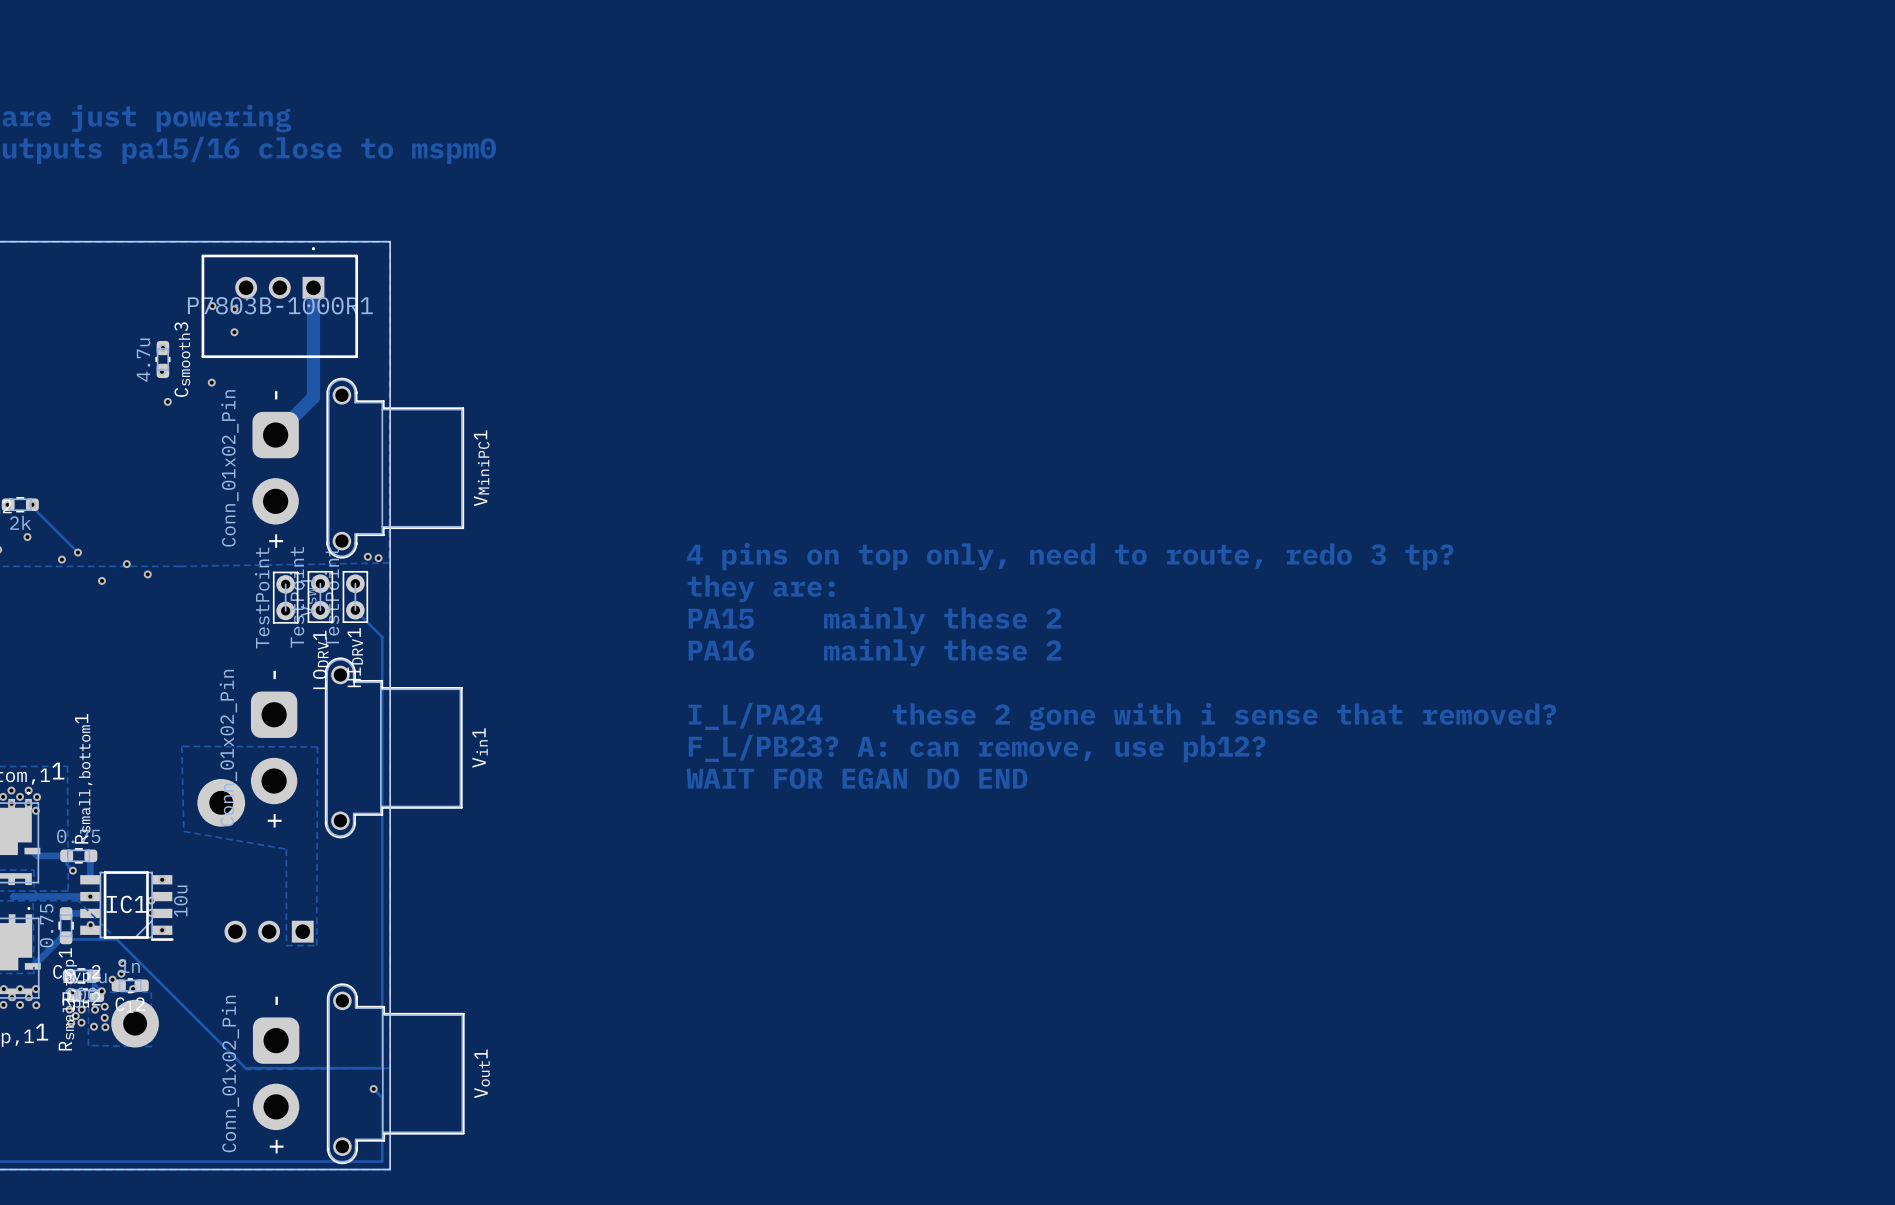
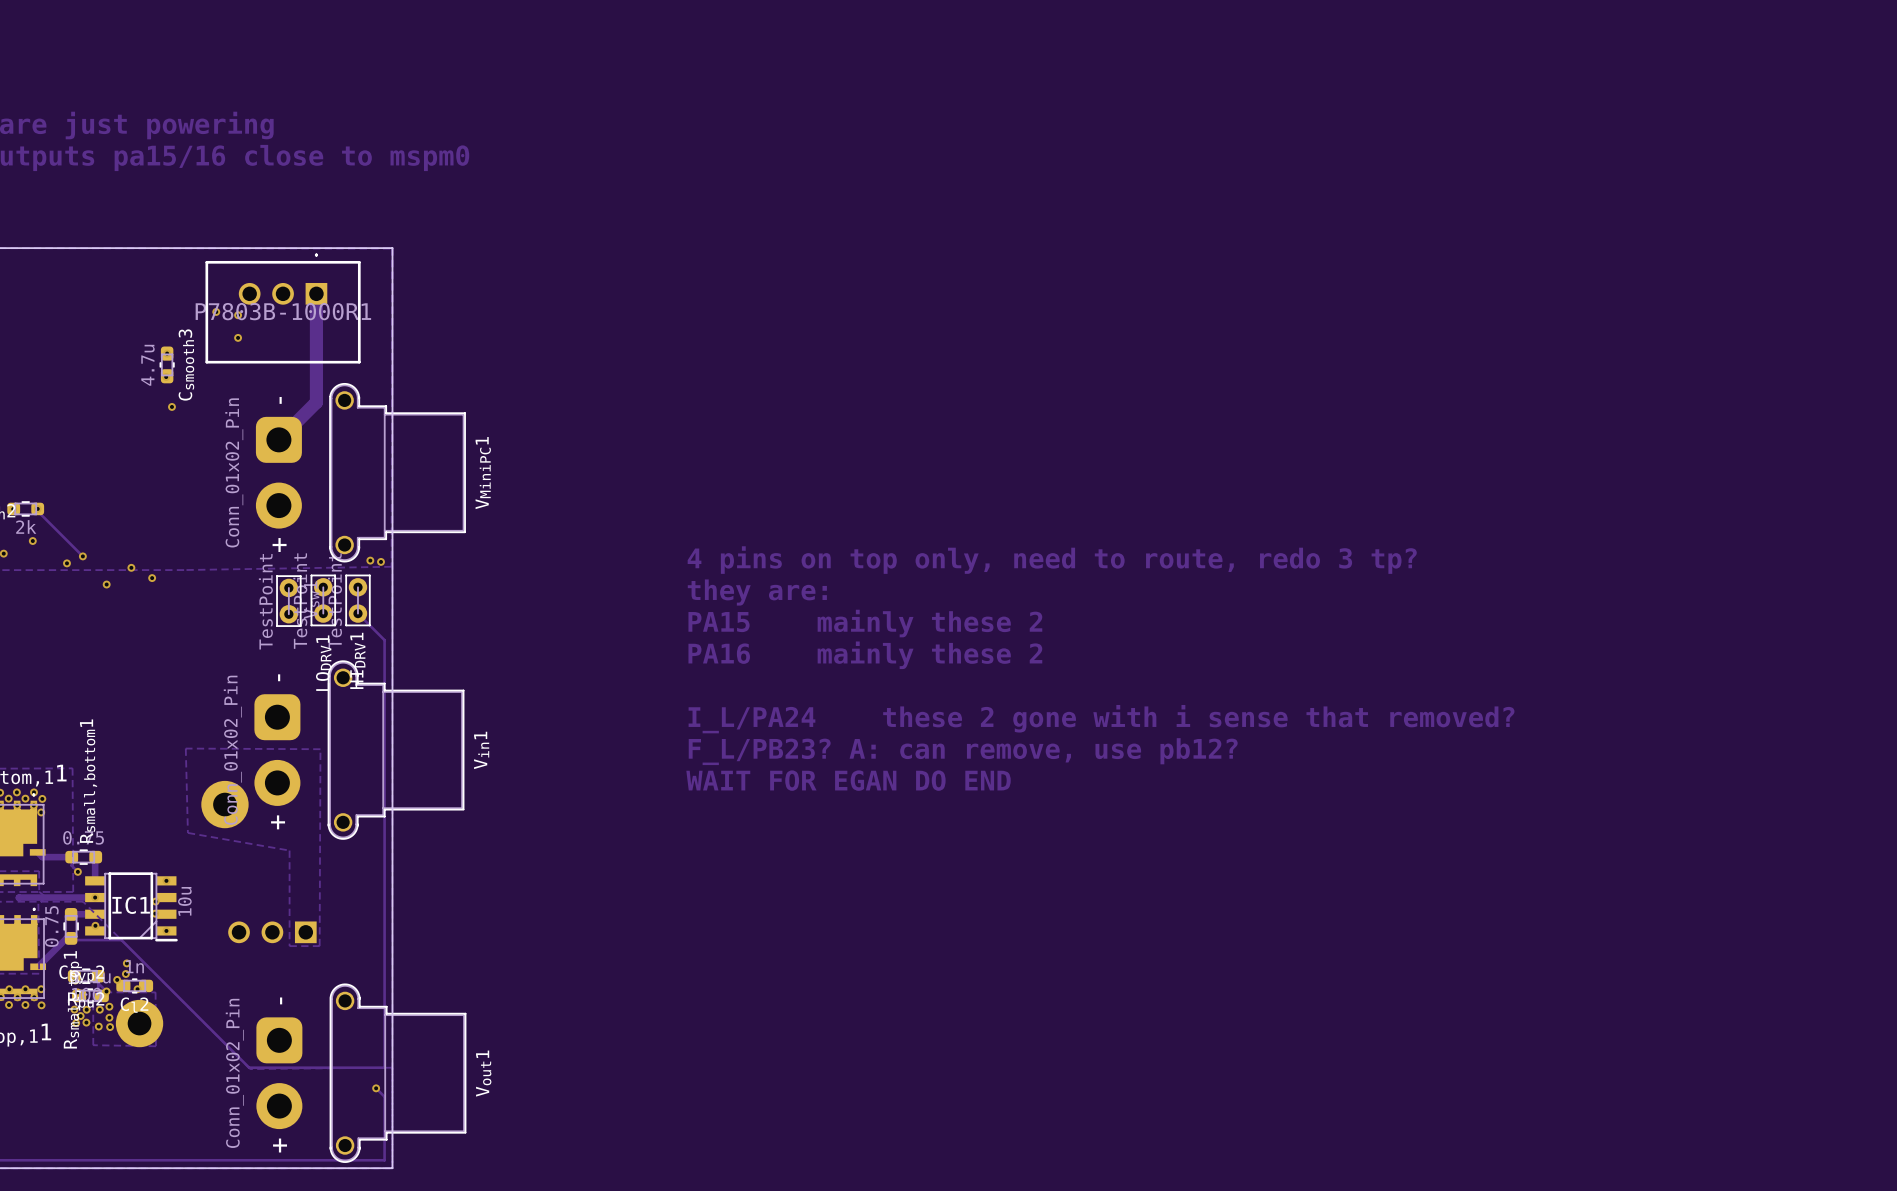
via: (211, 382) -> none

